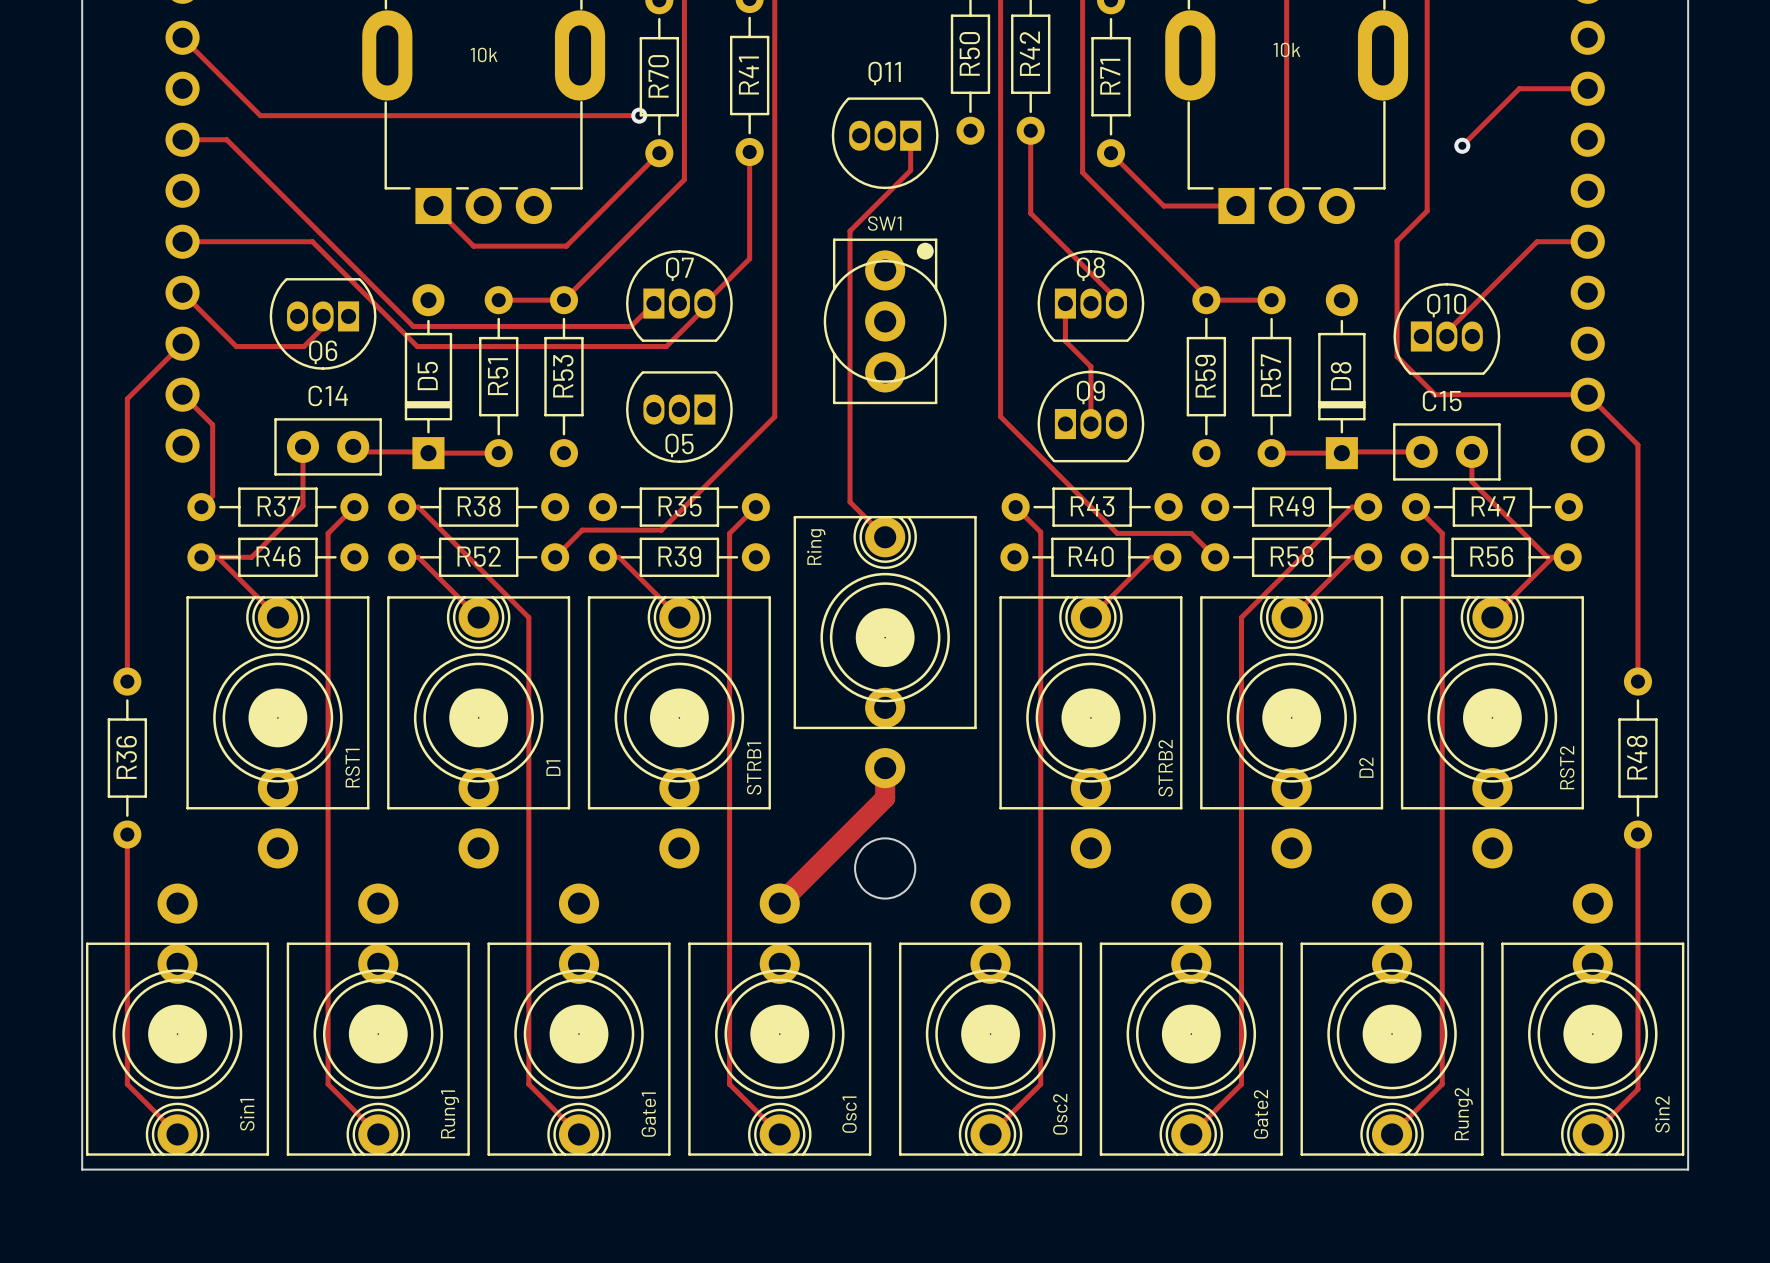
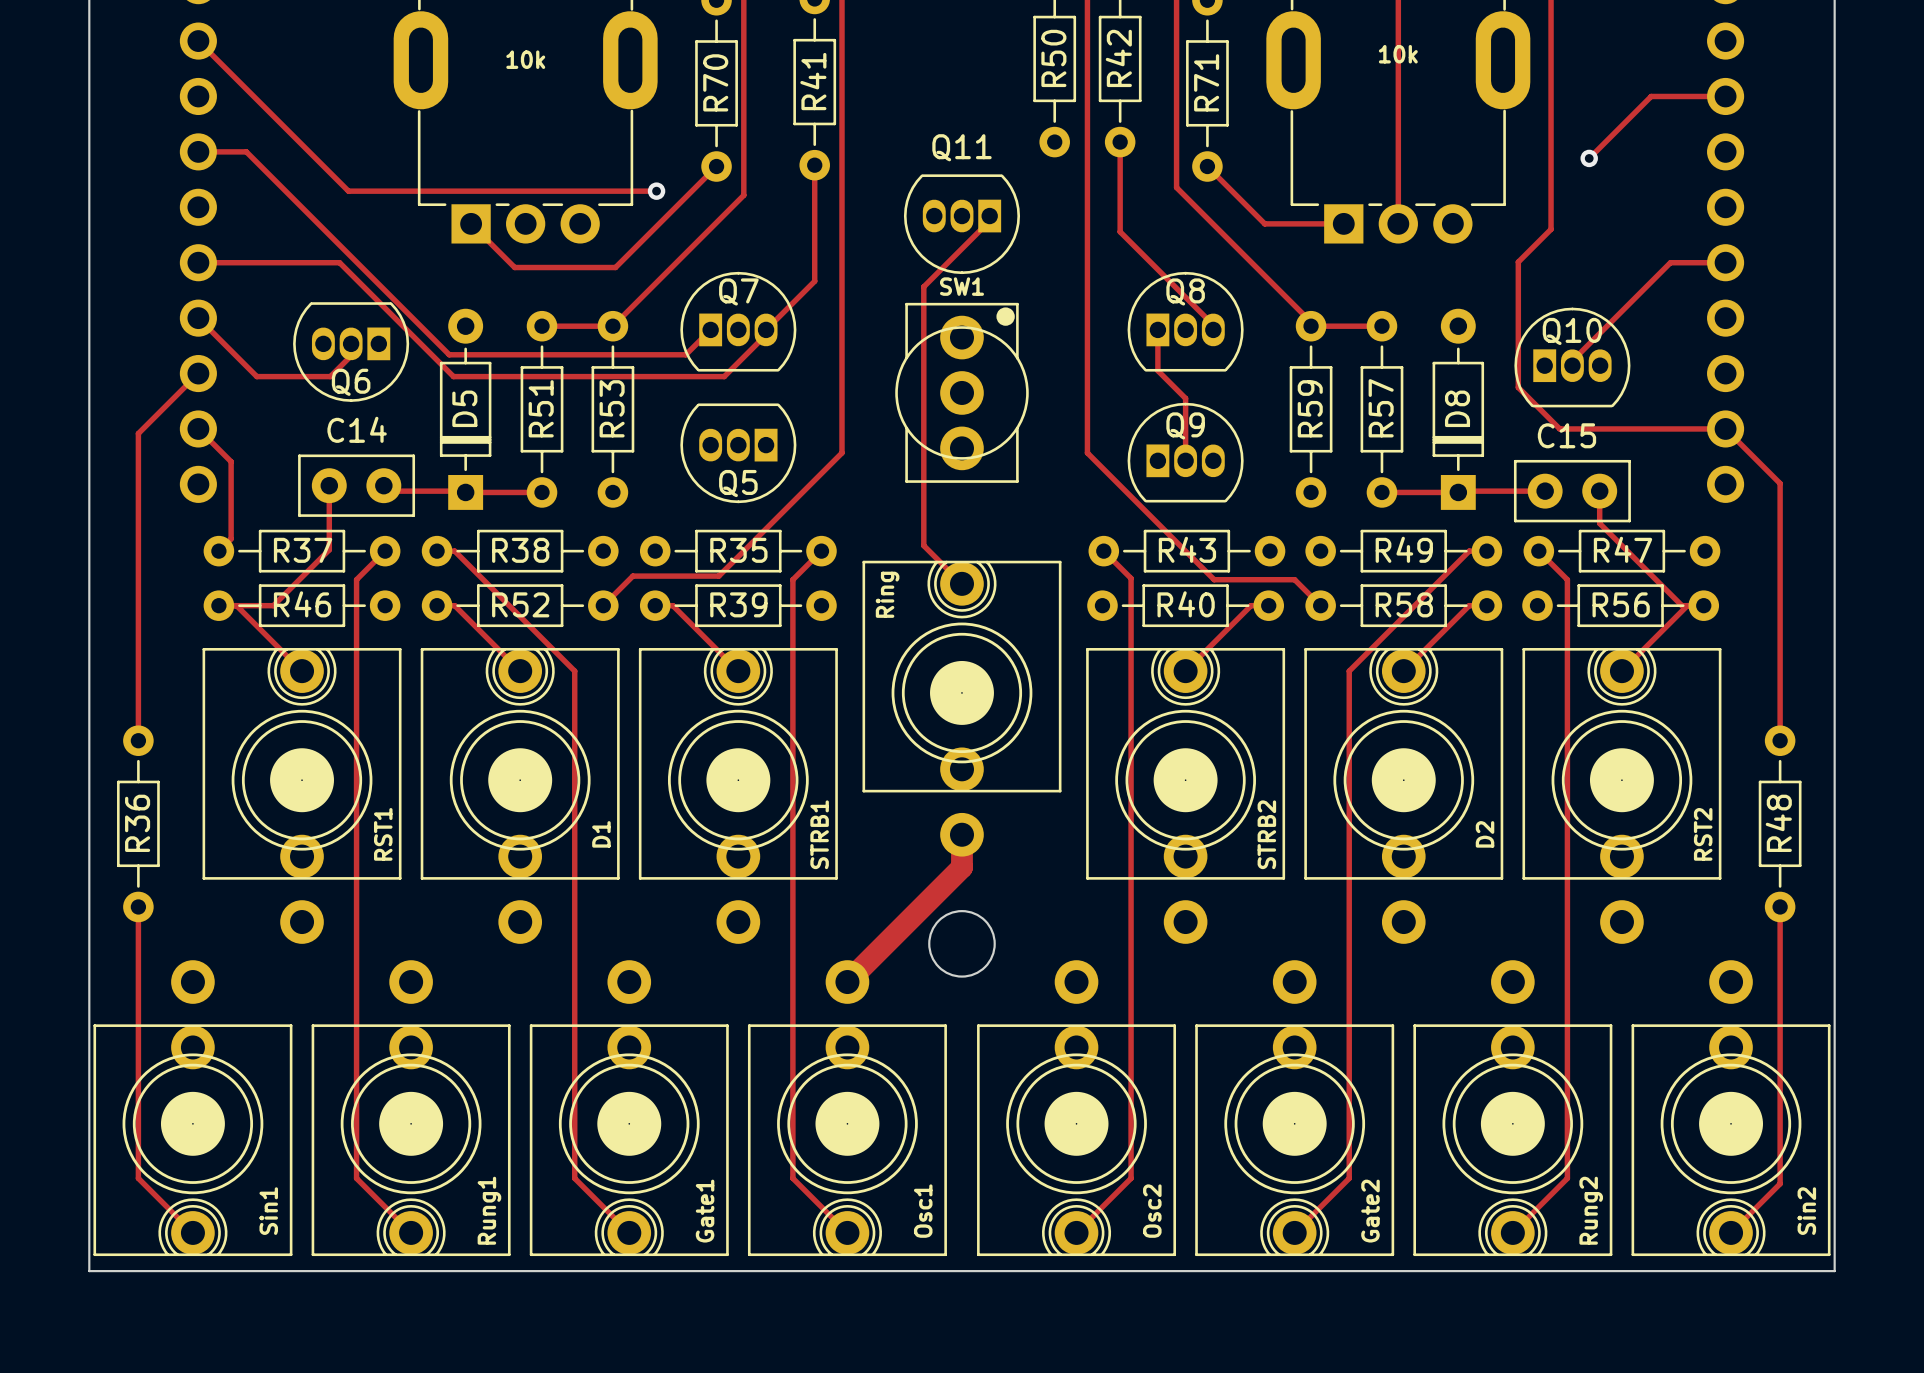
track: (260, 115) (639, 115) -> (283, 125) (348, 191) (656, 191)
via position: (639, 115) -> (656, 191)
track: (910, 135) (910, 170) (850, 231) (850, 263) -> (989, 216) (989, 220) (923, 286)
Q11 position: (885, 143) -> (961, 224)
SW1 position: (885, 321) -> (961, 392)

